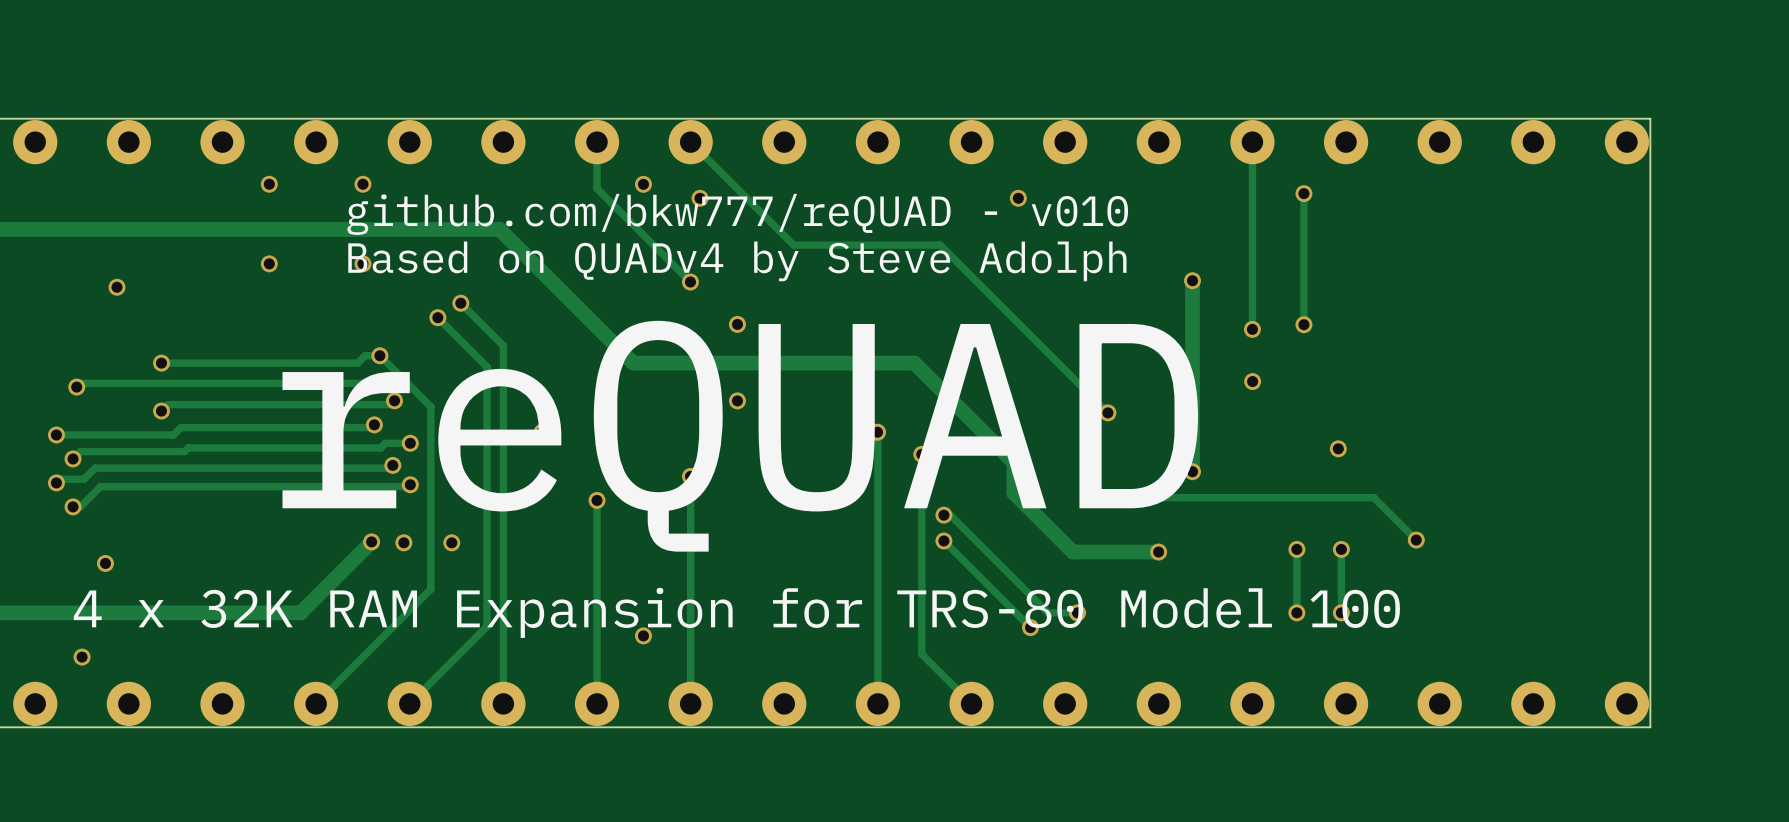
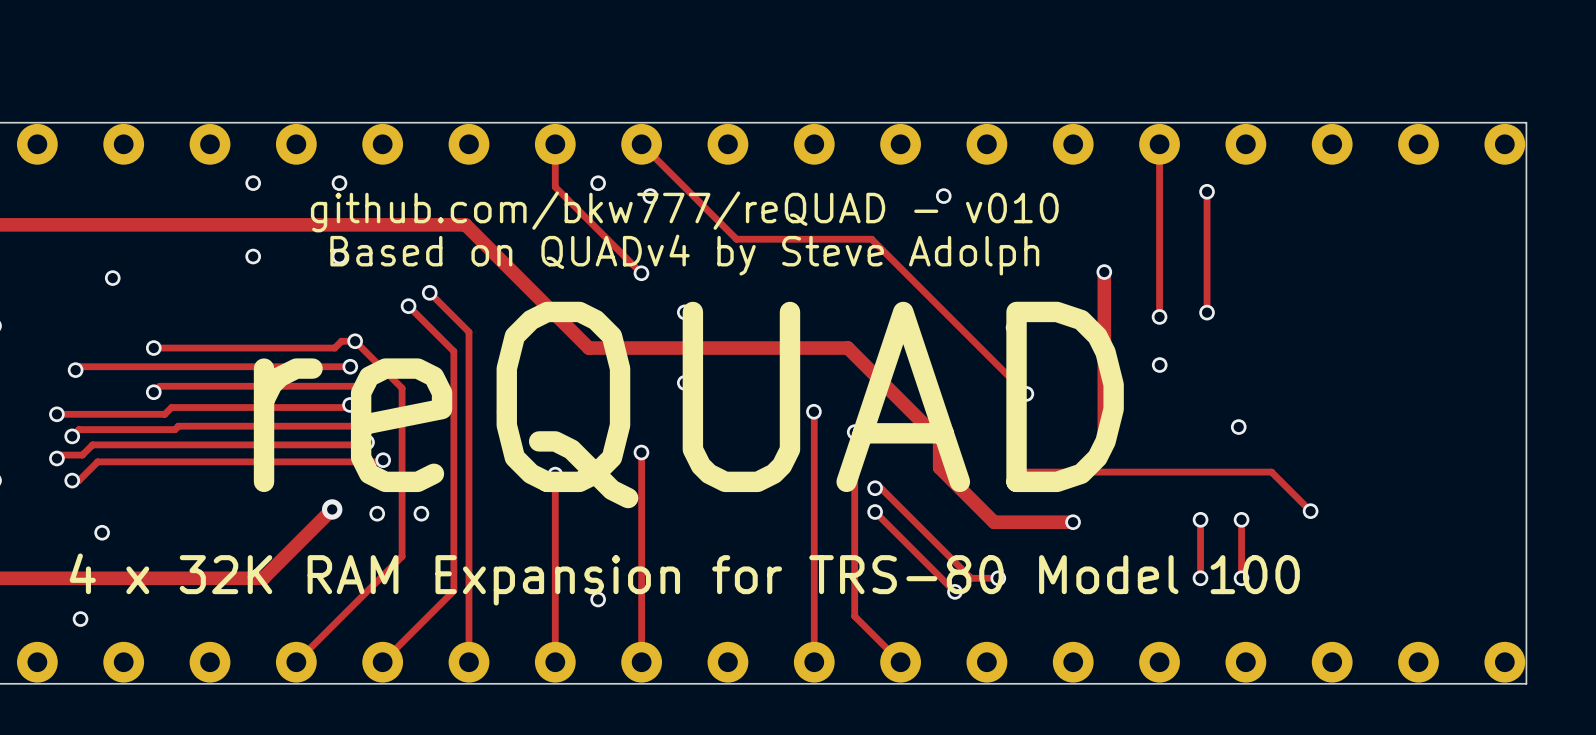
track: (371, 541) (300, 612) (280, 612) -> (332, 509) (263, 578)
via position: (371, 541) -> (332, 509)

